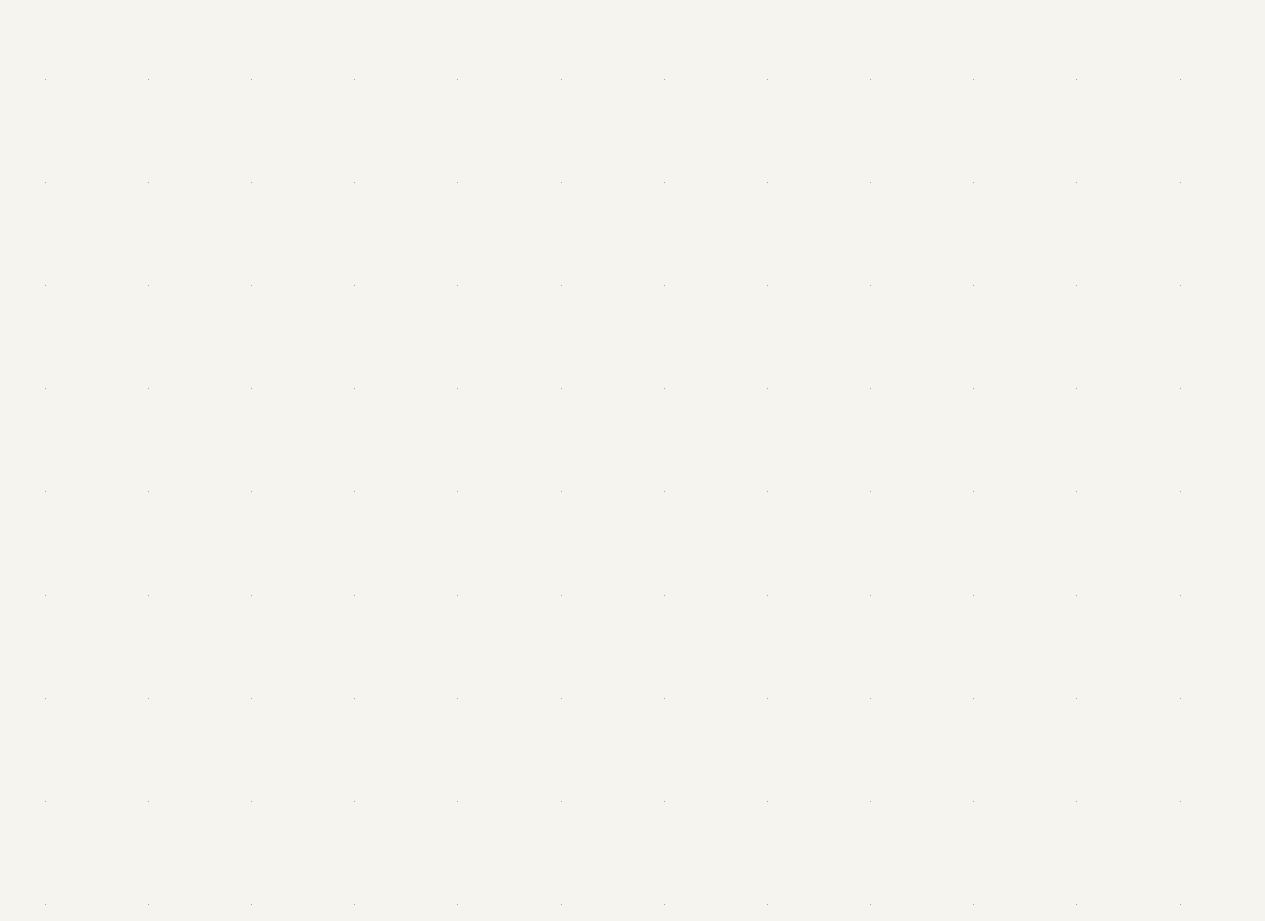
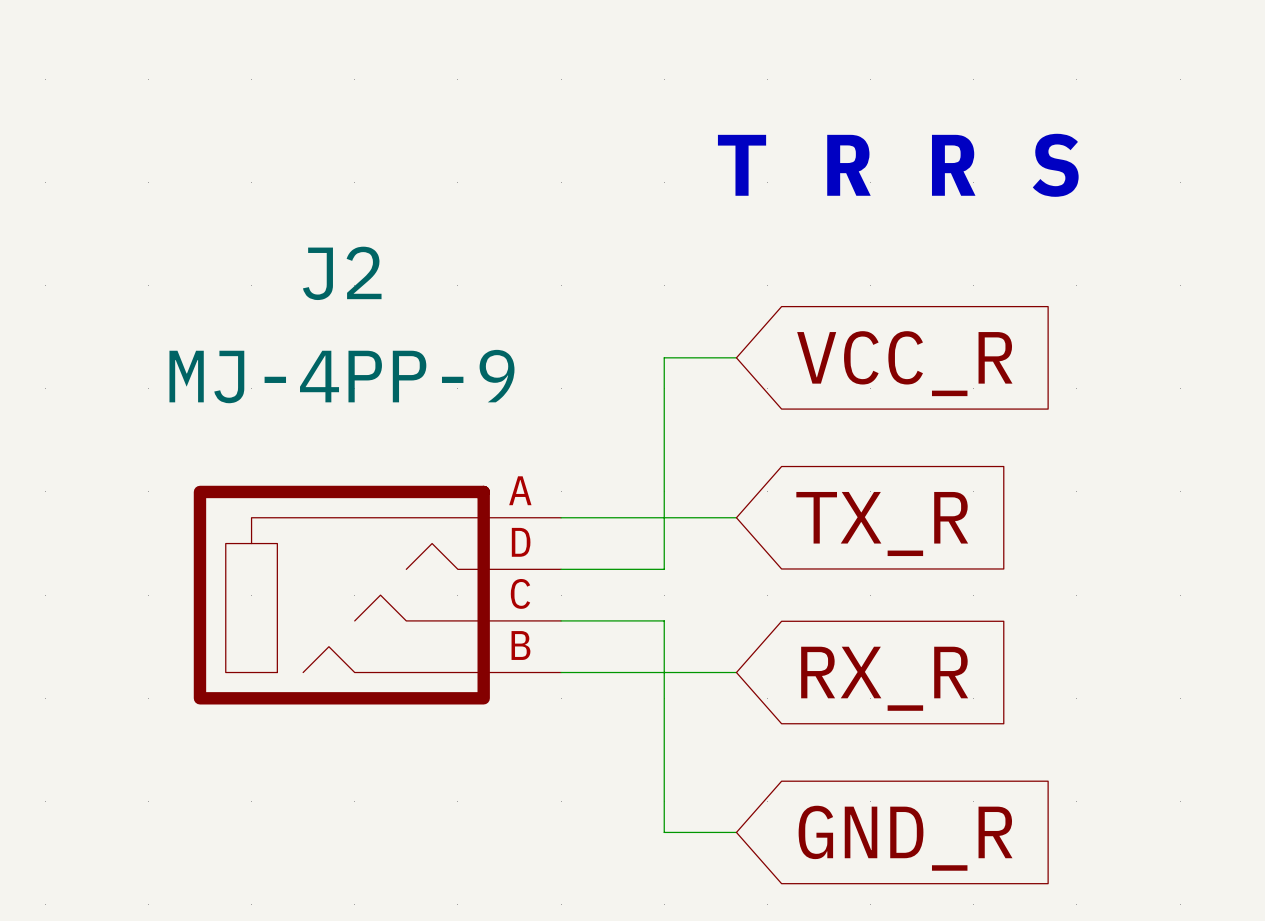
text: none -> T R R S (898, 165)
wire: none -> (736, 357) (664, 357) (664, 569) (561, 569)
global label: none -> VCC_R (904, 363)
wire: none -> (561, 517) (736, 517)
global label: none -> TX_R (882, 524)
J2: none -> MJ-4PP-9 (377, 595)
wire: none -> (561, 620) (664, 620) (664, 832) (736, 832)
wire: none -> (561, 672) (736, 672)
global label: none -> RX_R (884, 678)
global label: none -> GND_R (905, 838)

